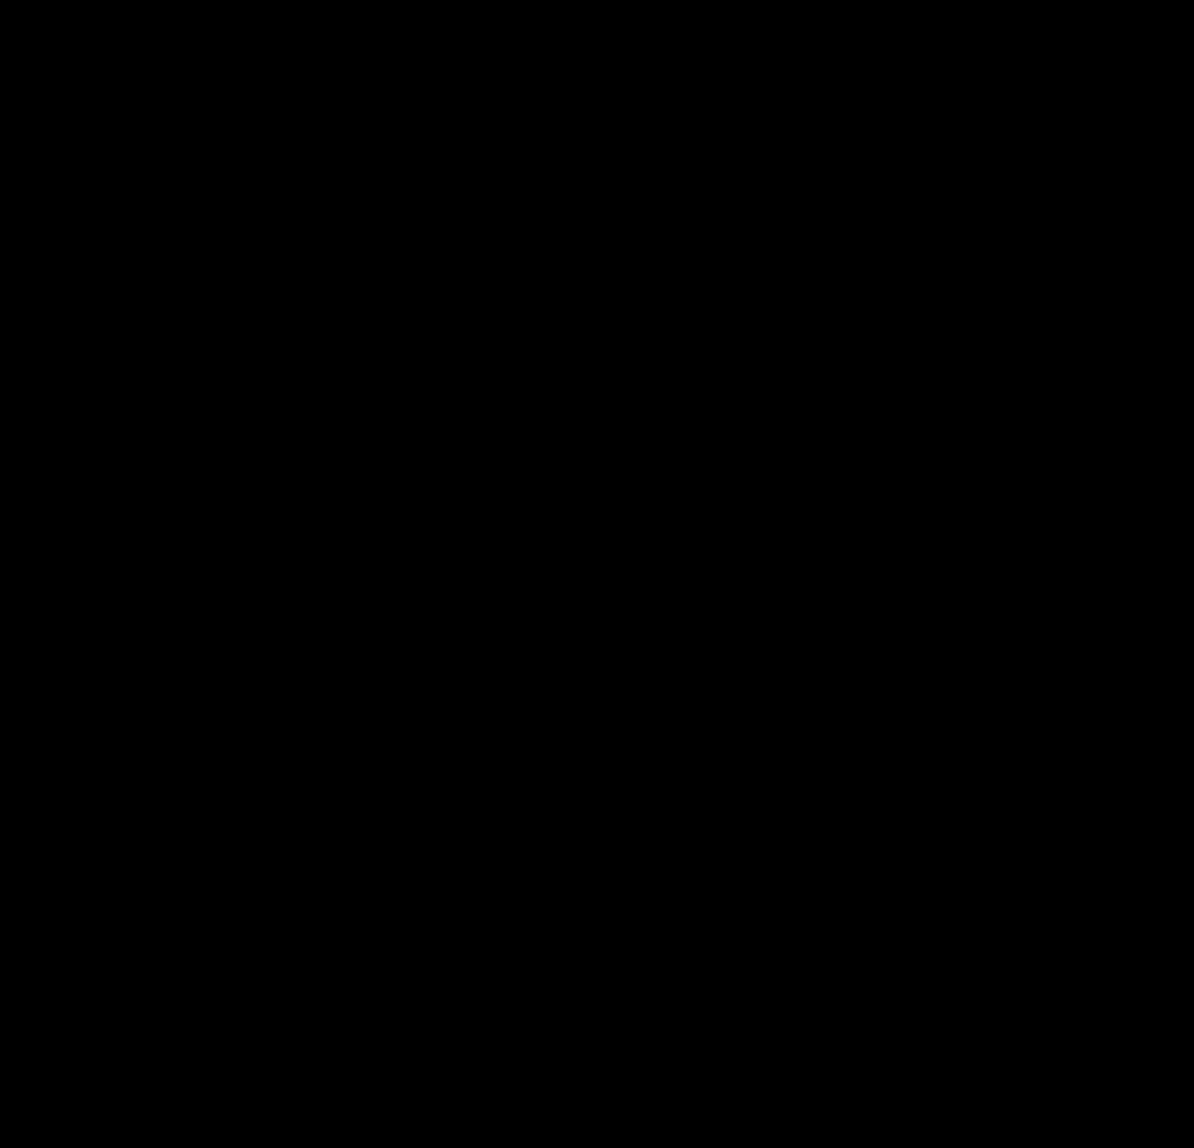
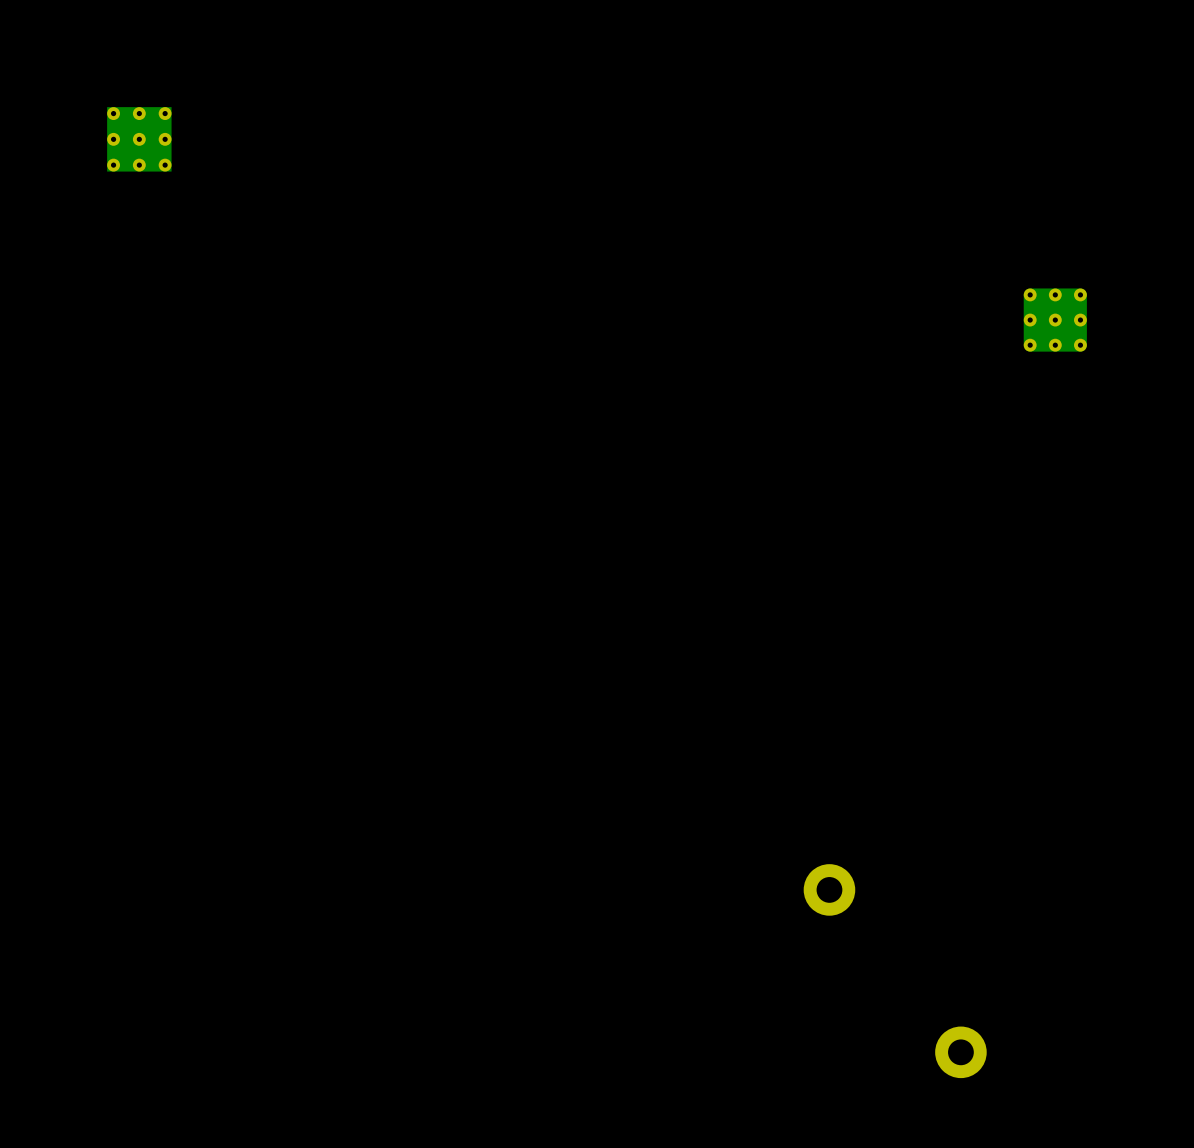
part: none -> (139, 139)
part: none -> (1055, 320)
part: none -> (829, 889)
part: none -> (960, 1052)

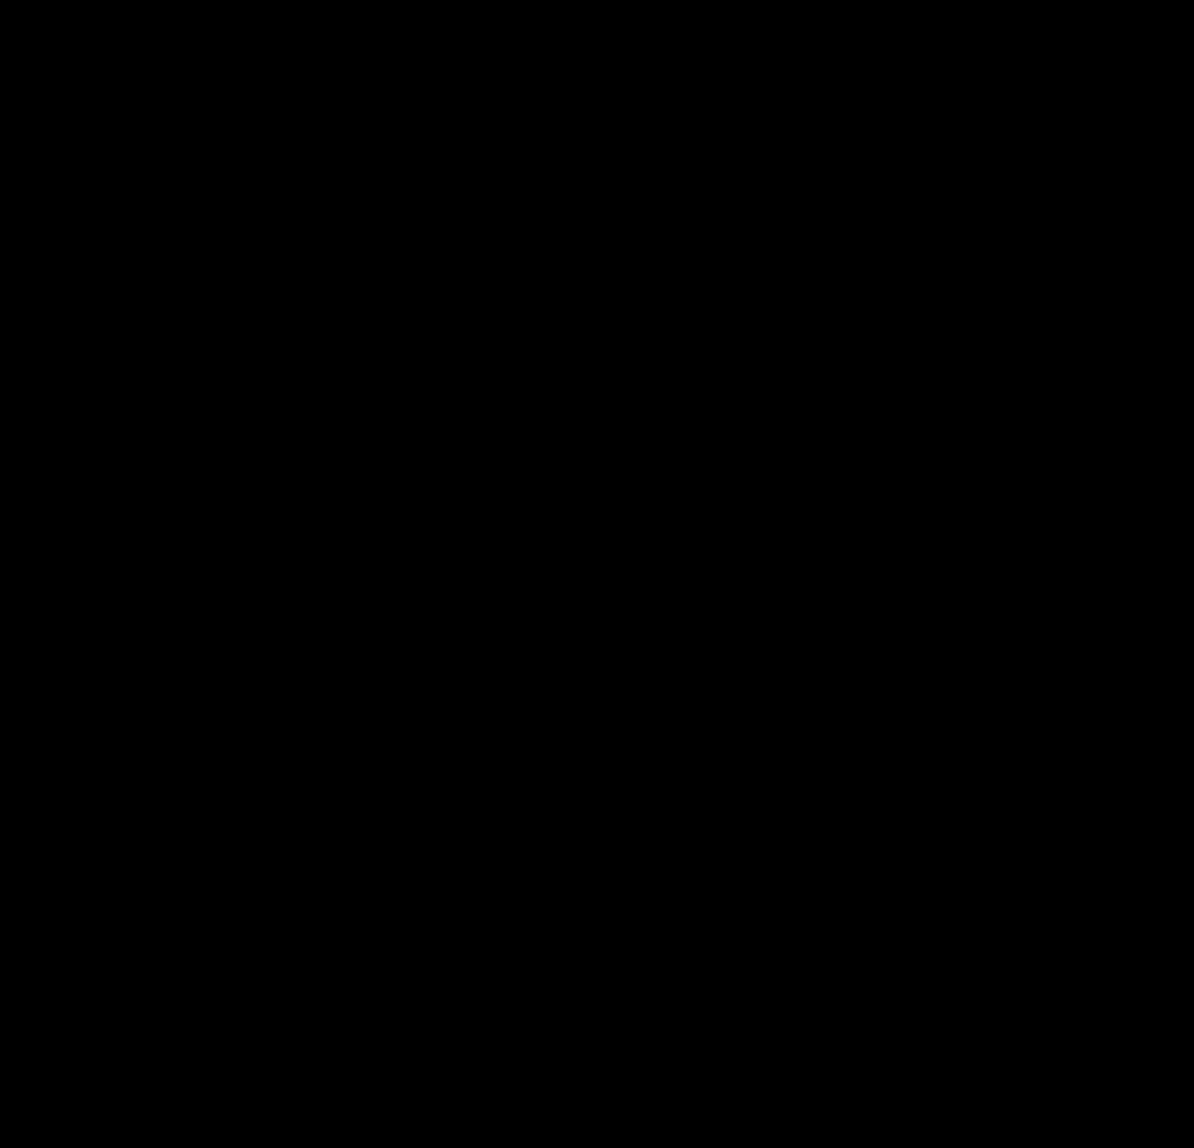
part: (139, 139) -> none
part: (1055, 320) -> none
part: (829, 889) -> none
part: (960, 1052) -> none

